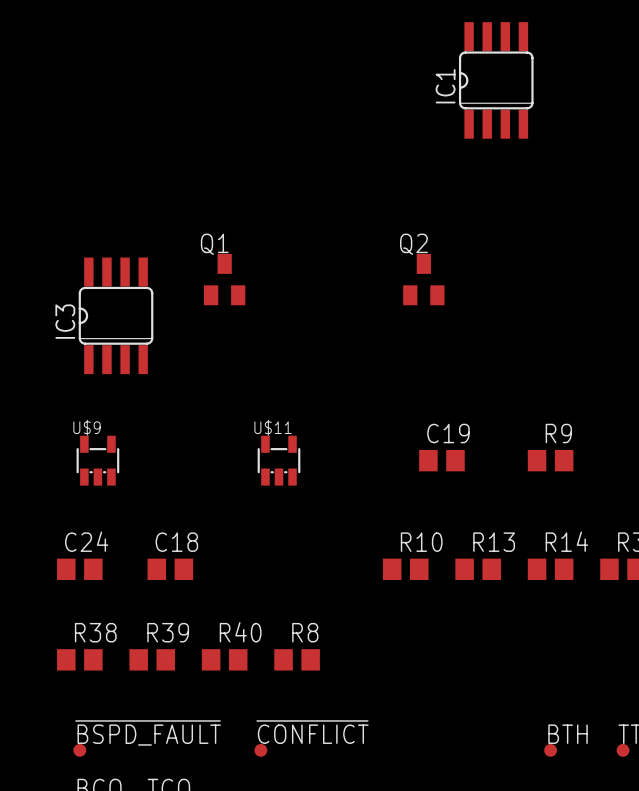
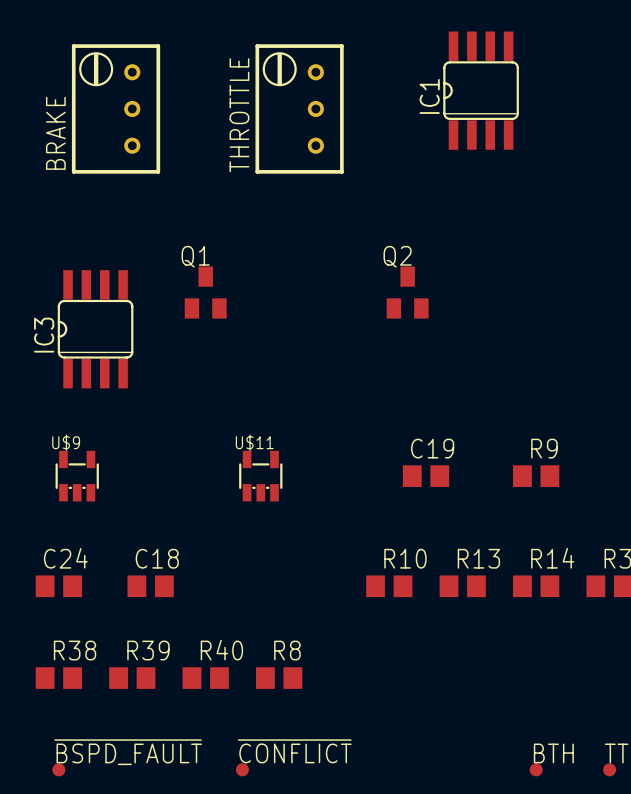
BRAKE: none -> (116, 108)
THROTTLE: none -> (299, 108)

